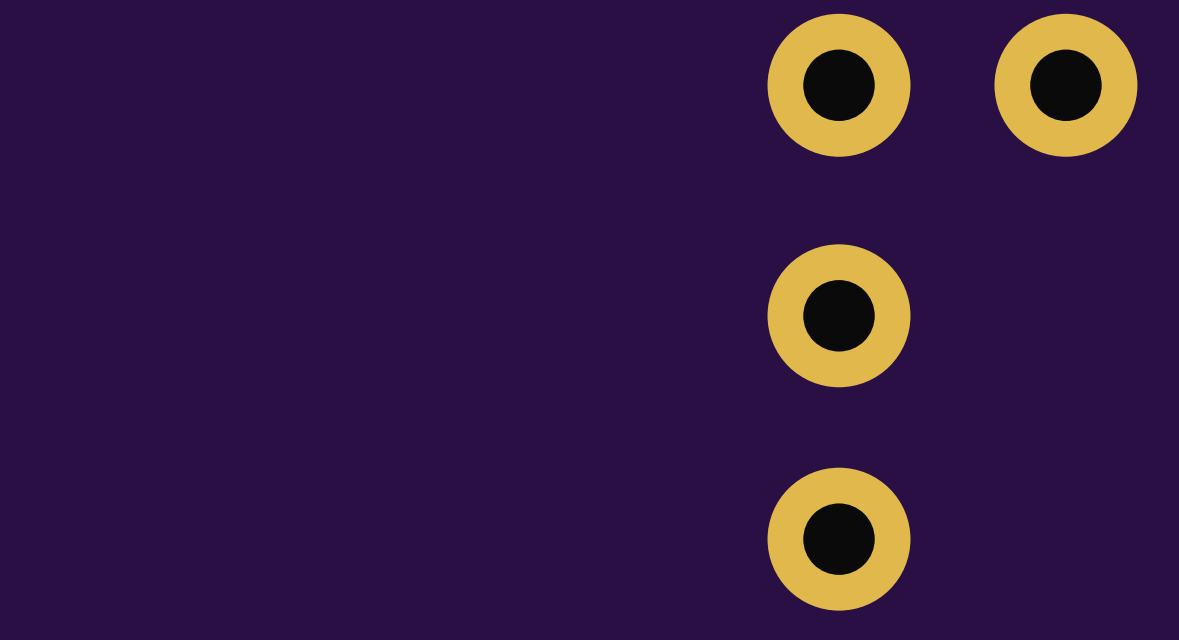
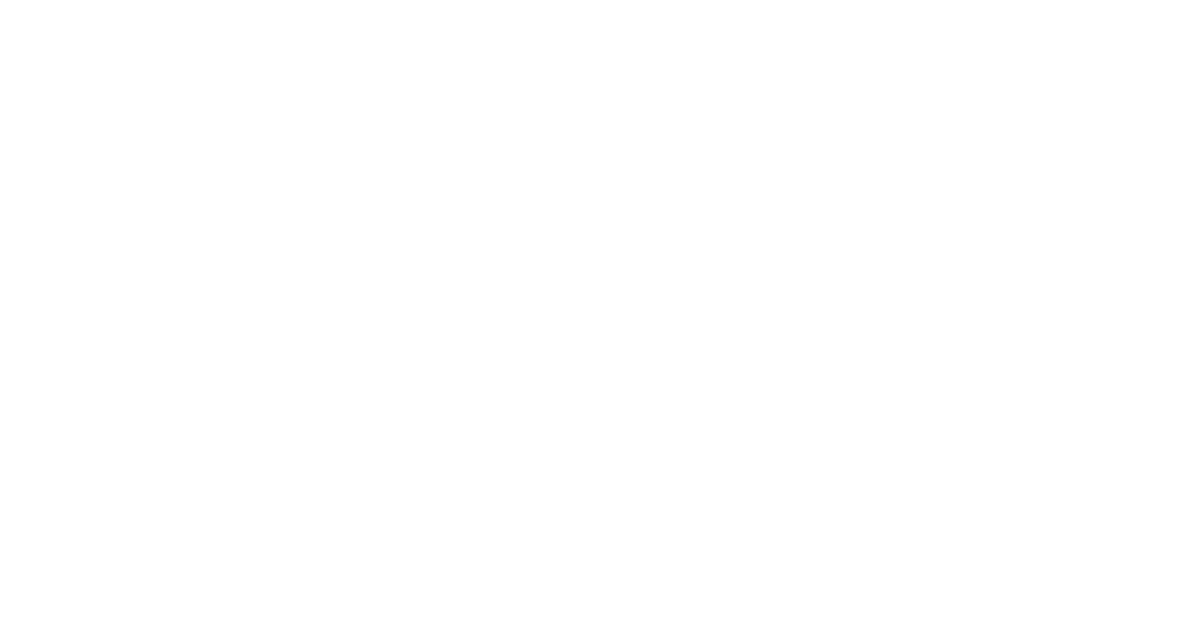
part: (952, 85) -> none
part: (839, 427) -> none

